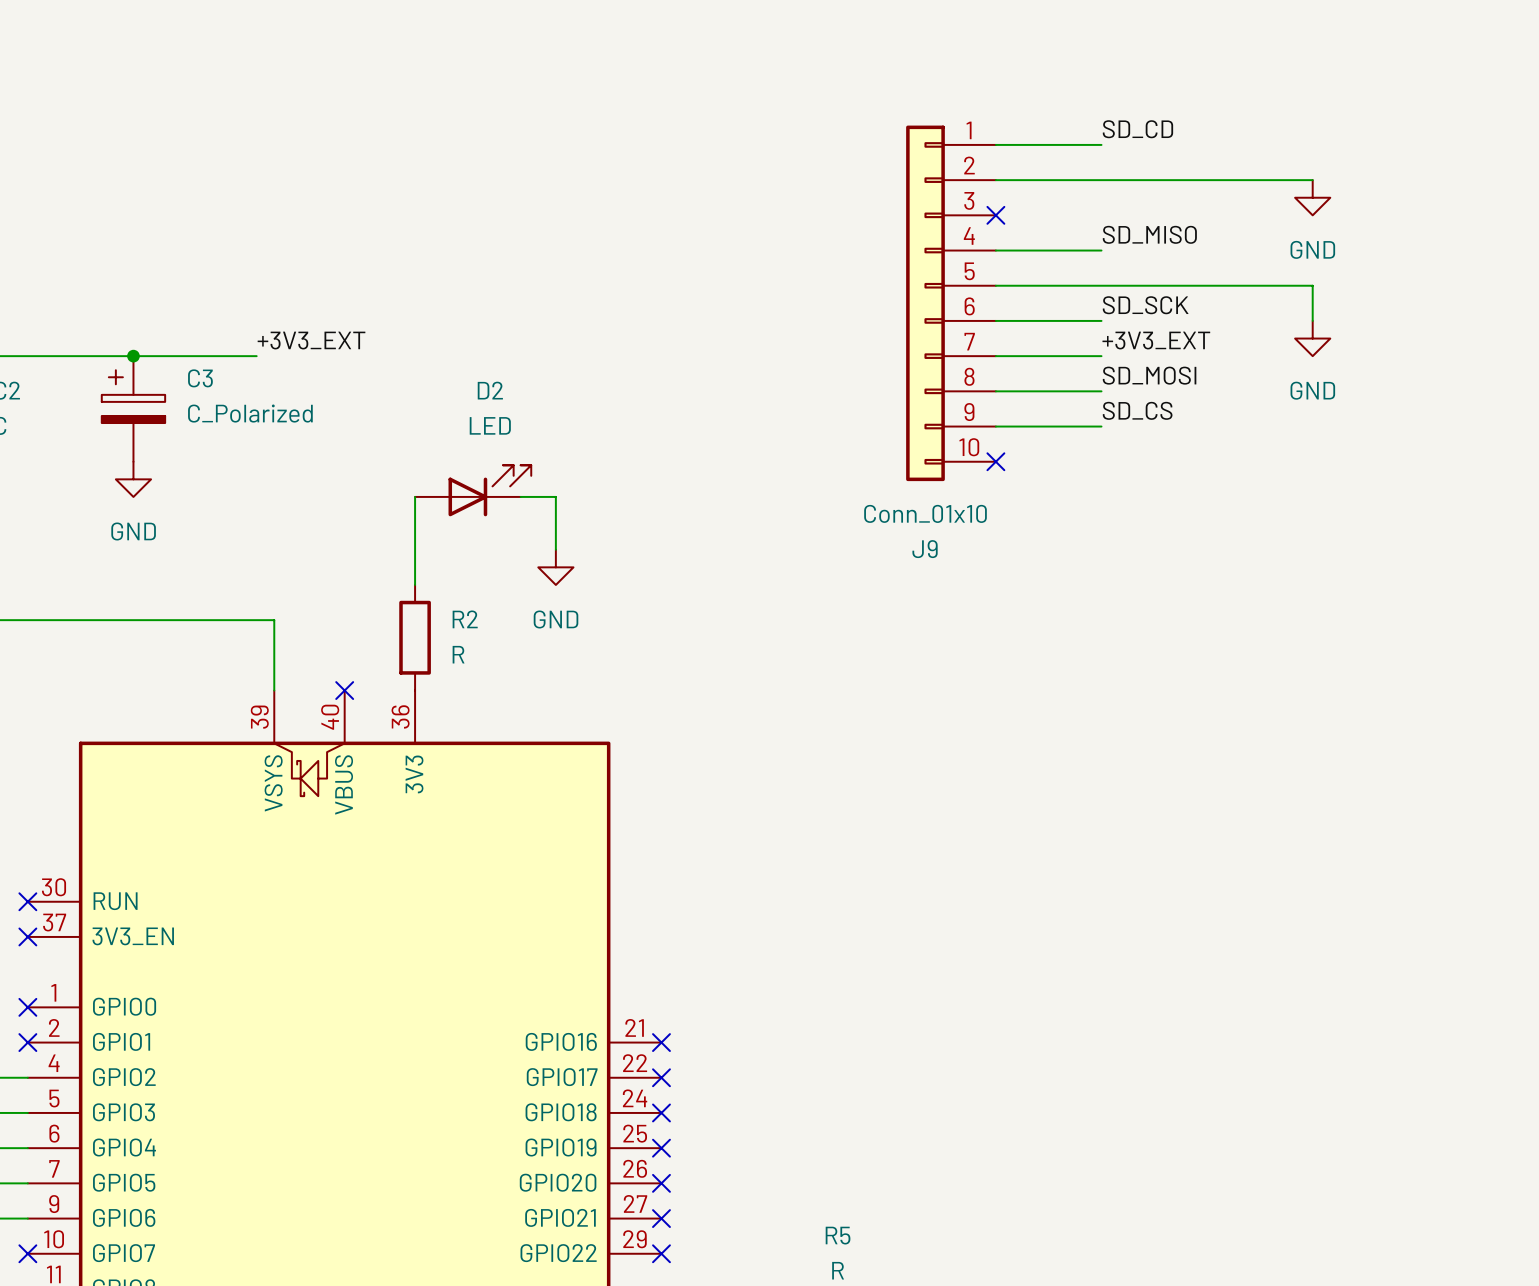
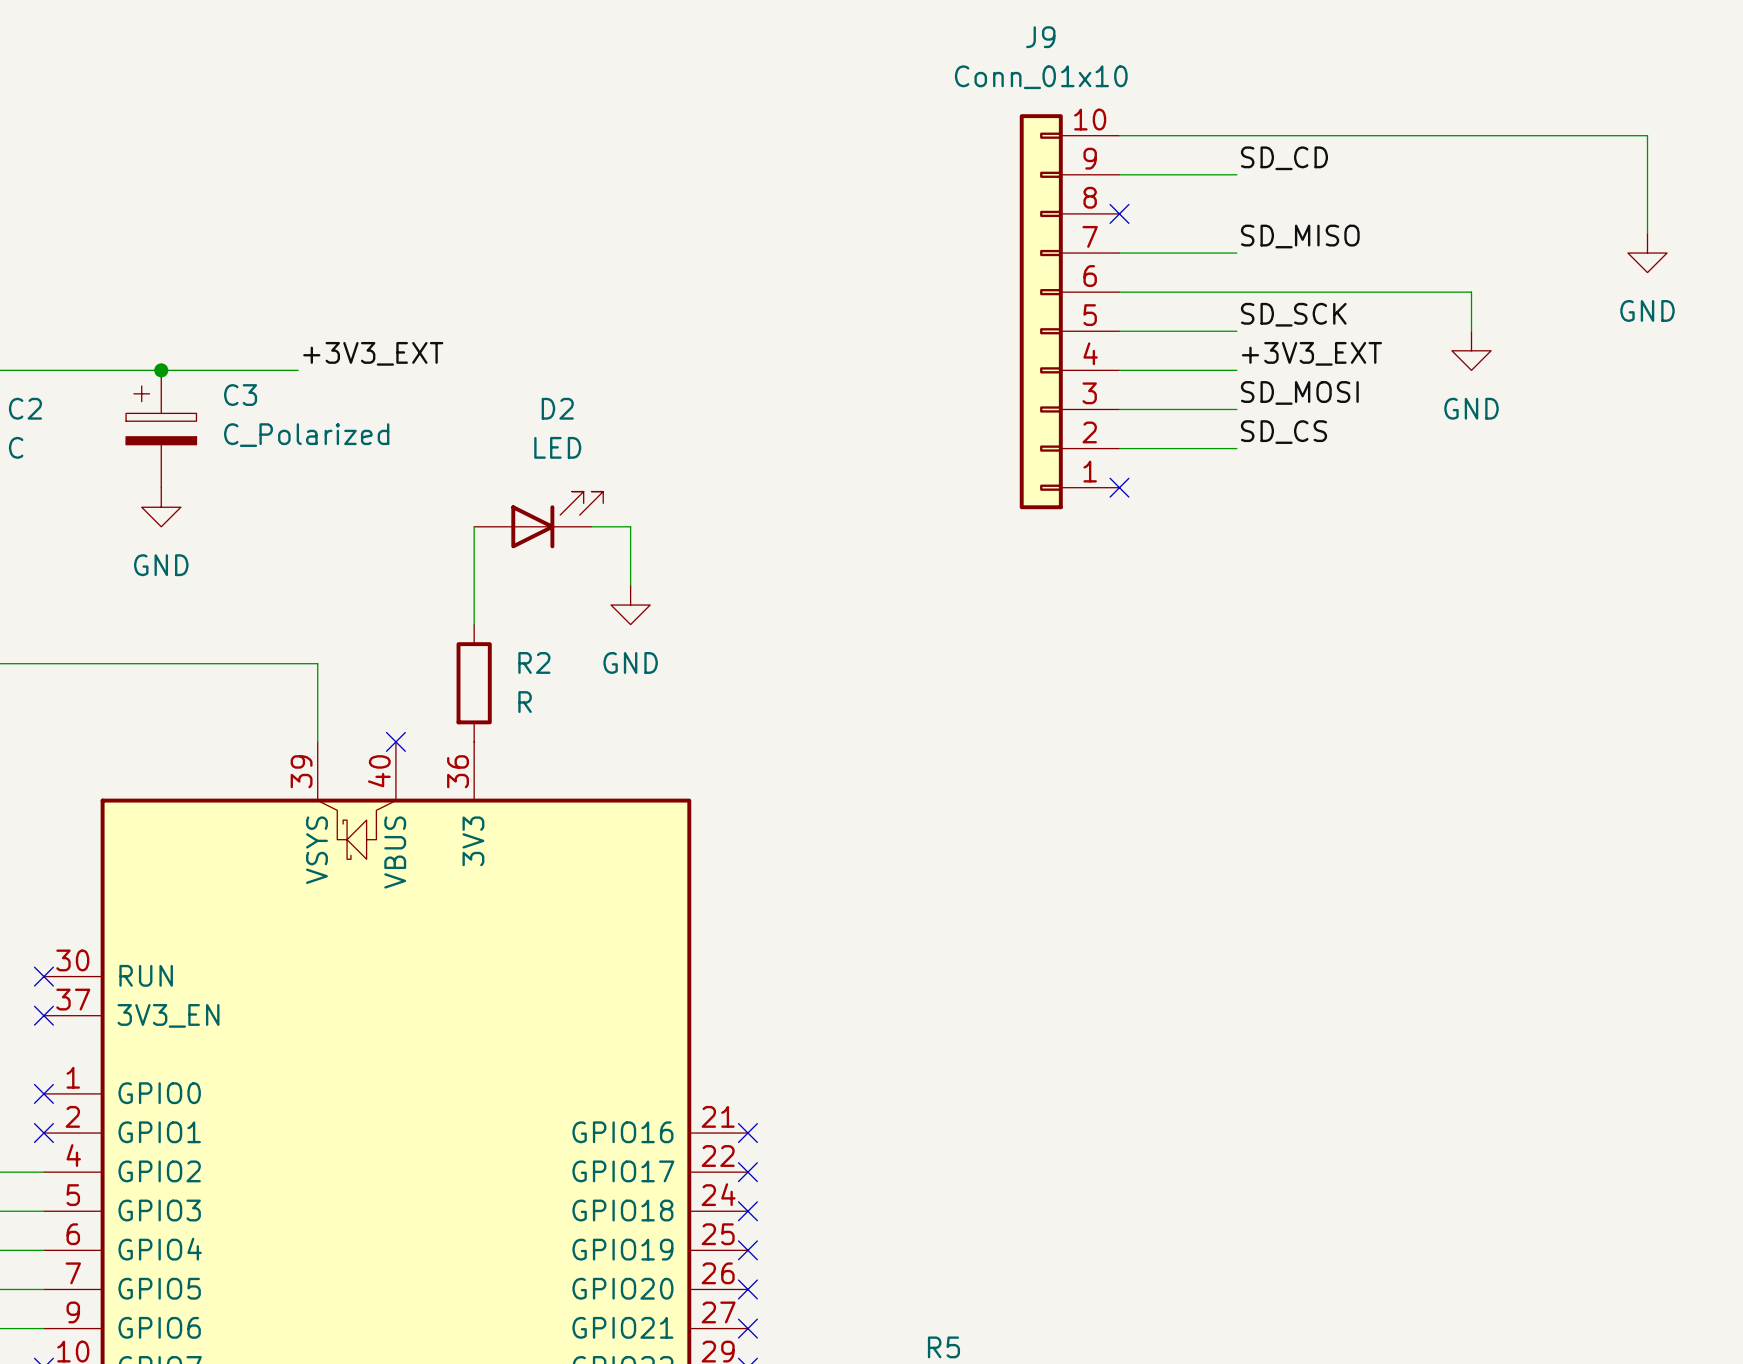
label position: SD_CD (1137, 129) -> SD_CD (1284, 158)
wire: none -> (1236, 135) (1647, 135) (1647, 233)
wire: (1101, 180) (1312, 180) -> none
power symbol position: GND (1312, 197) -> GND (1647, 253)
J9 flip: as is (925, 303) -> up-down (1041, 311)

